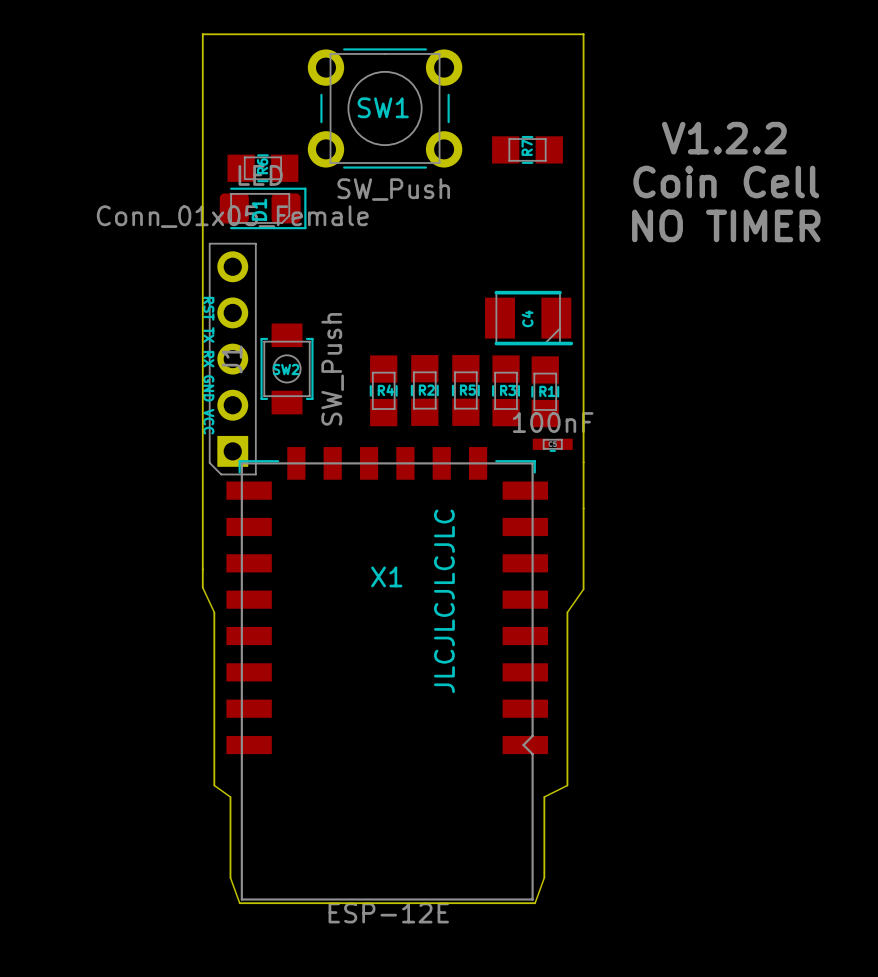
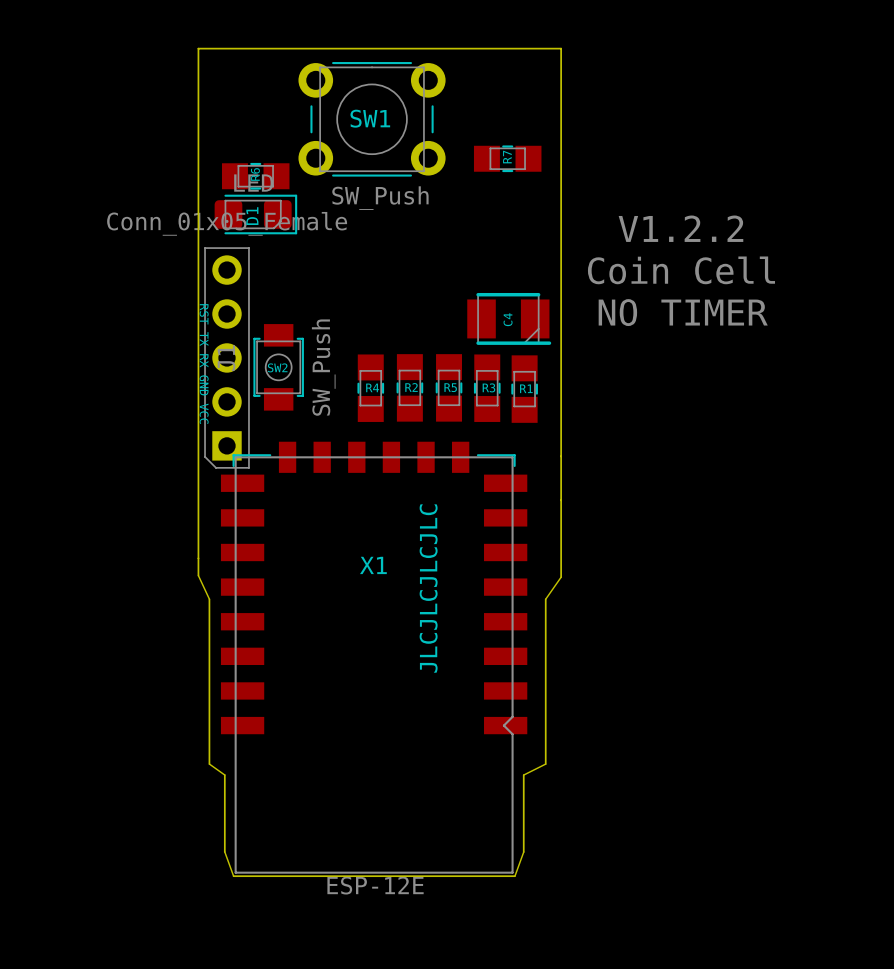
text: V1.2.2 (724, 138) -> none
text position: Coin Cell (726, 182) -> Coin Cell (681, 270)
text: NO TIMER (726, 225) -> V1.2.2 (680, 228)
text: none -> NO TIMER (683, 312)
part: 100nF (552, 445) -> none

